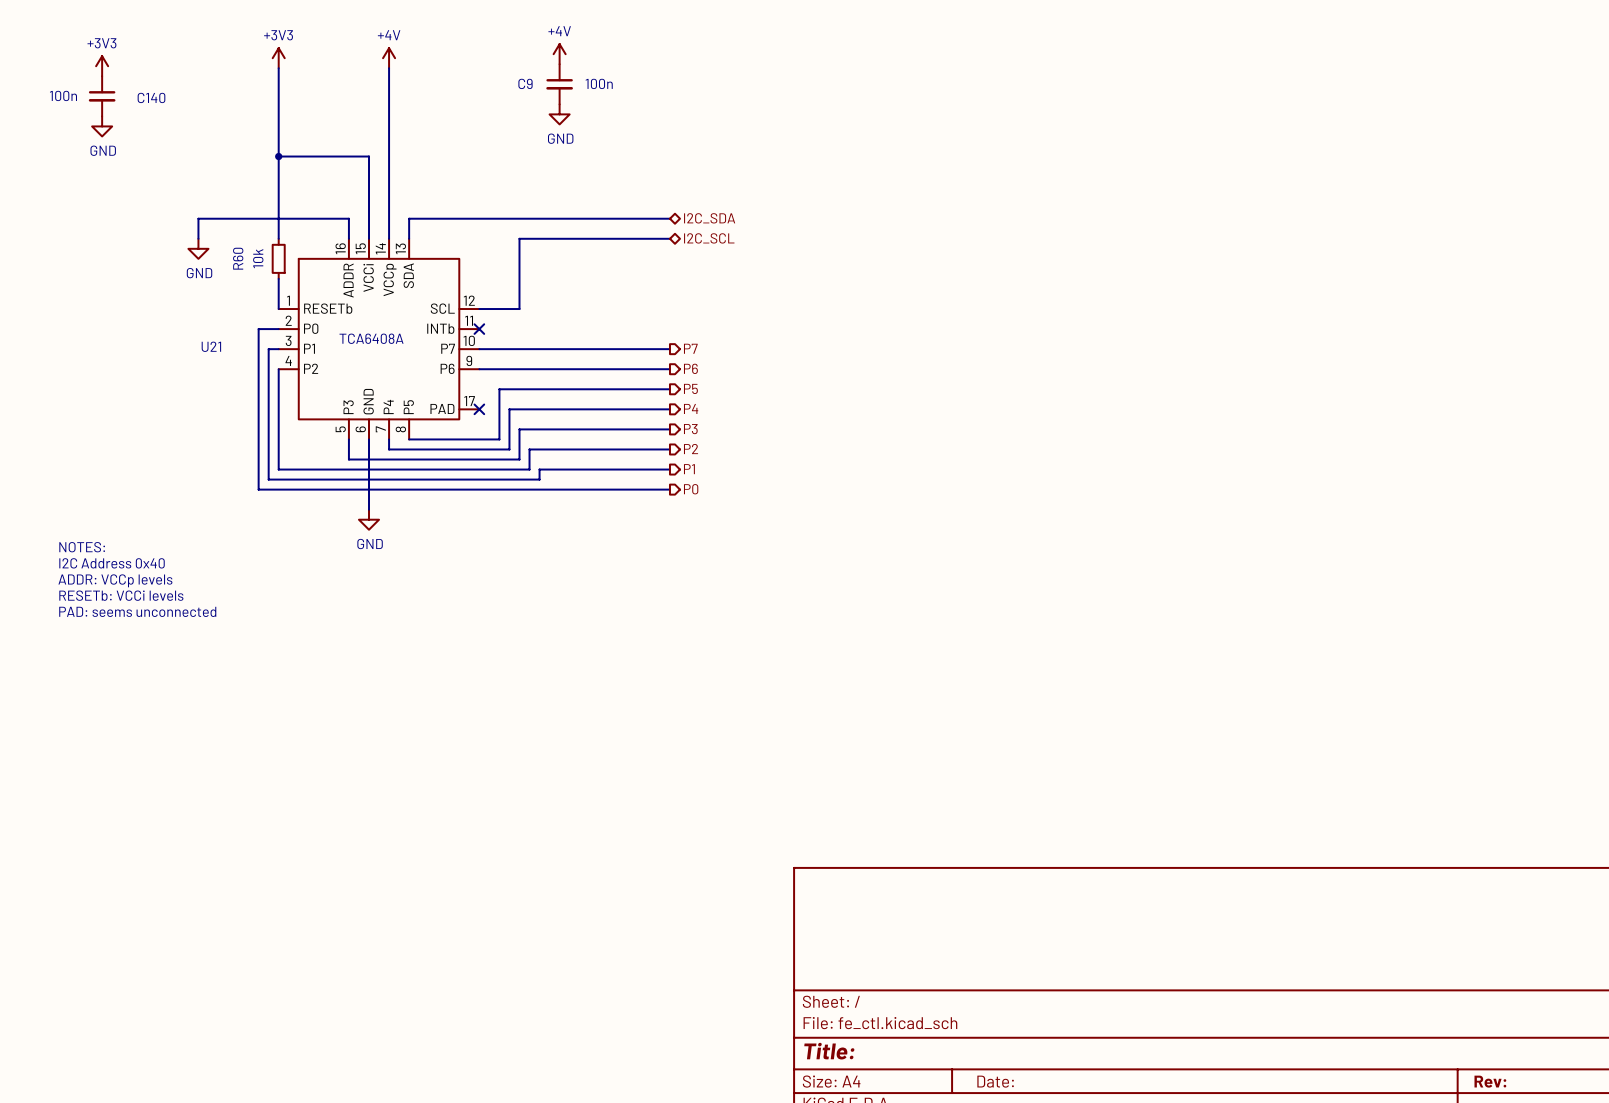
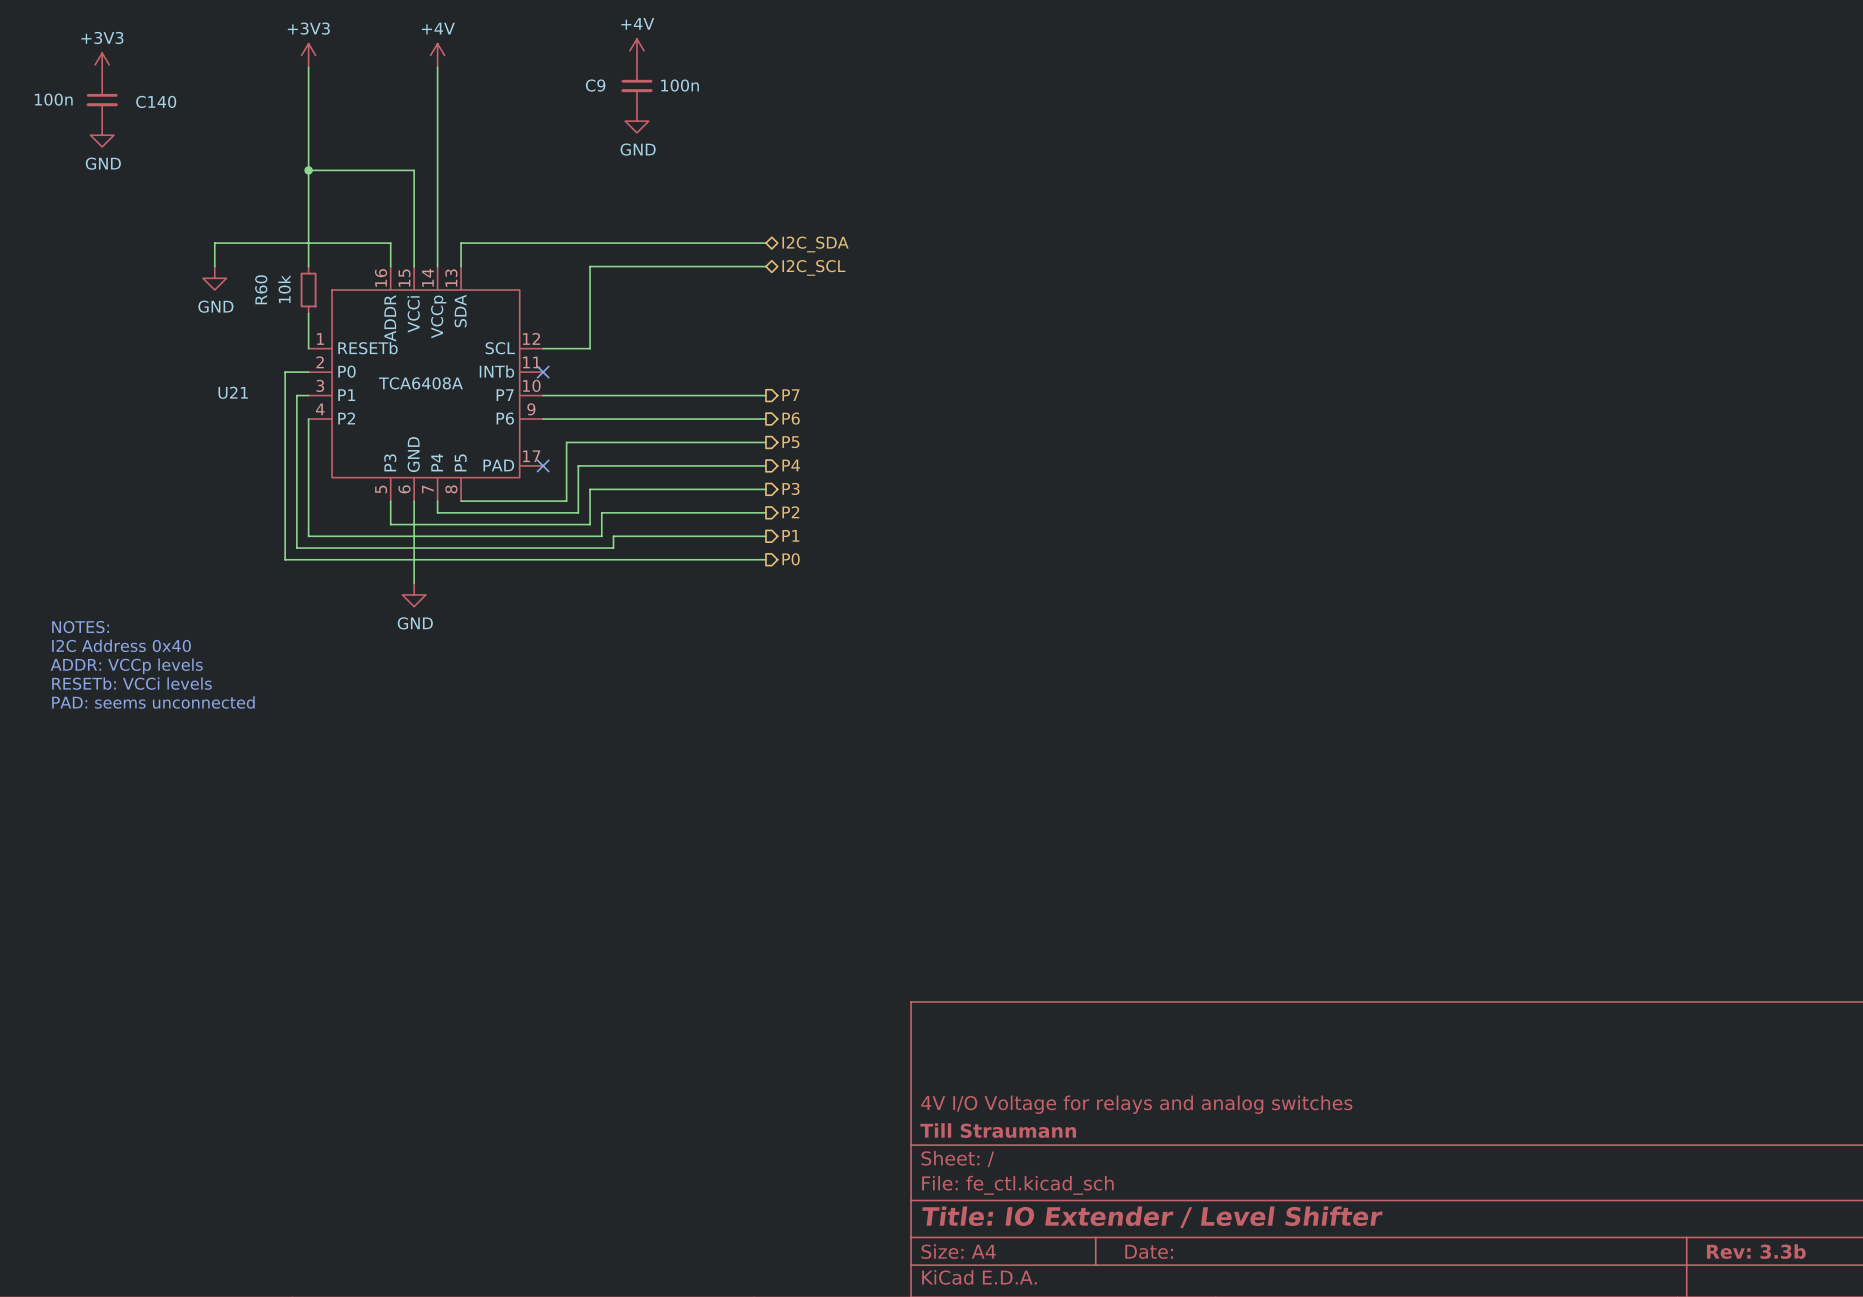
title block: none -> 4V I/O Voltage for relays and analog switches (1136, 1104)
title block: none -> Till Straumann (998, 1130)
title block: Title: (829, 1051) -> Title: IO Extender / Level Shifter (1152, 1217)
title block: Rev: (1490, 1081) -> Rev: 3.3b (1756, 1251)

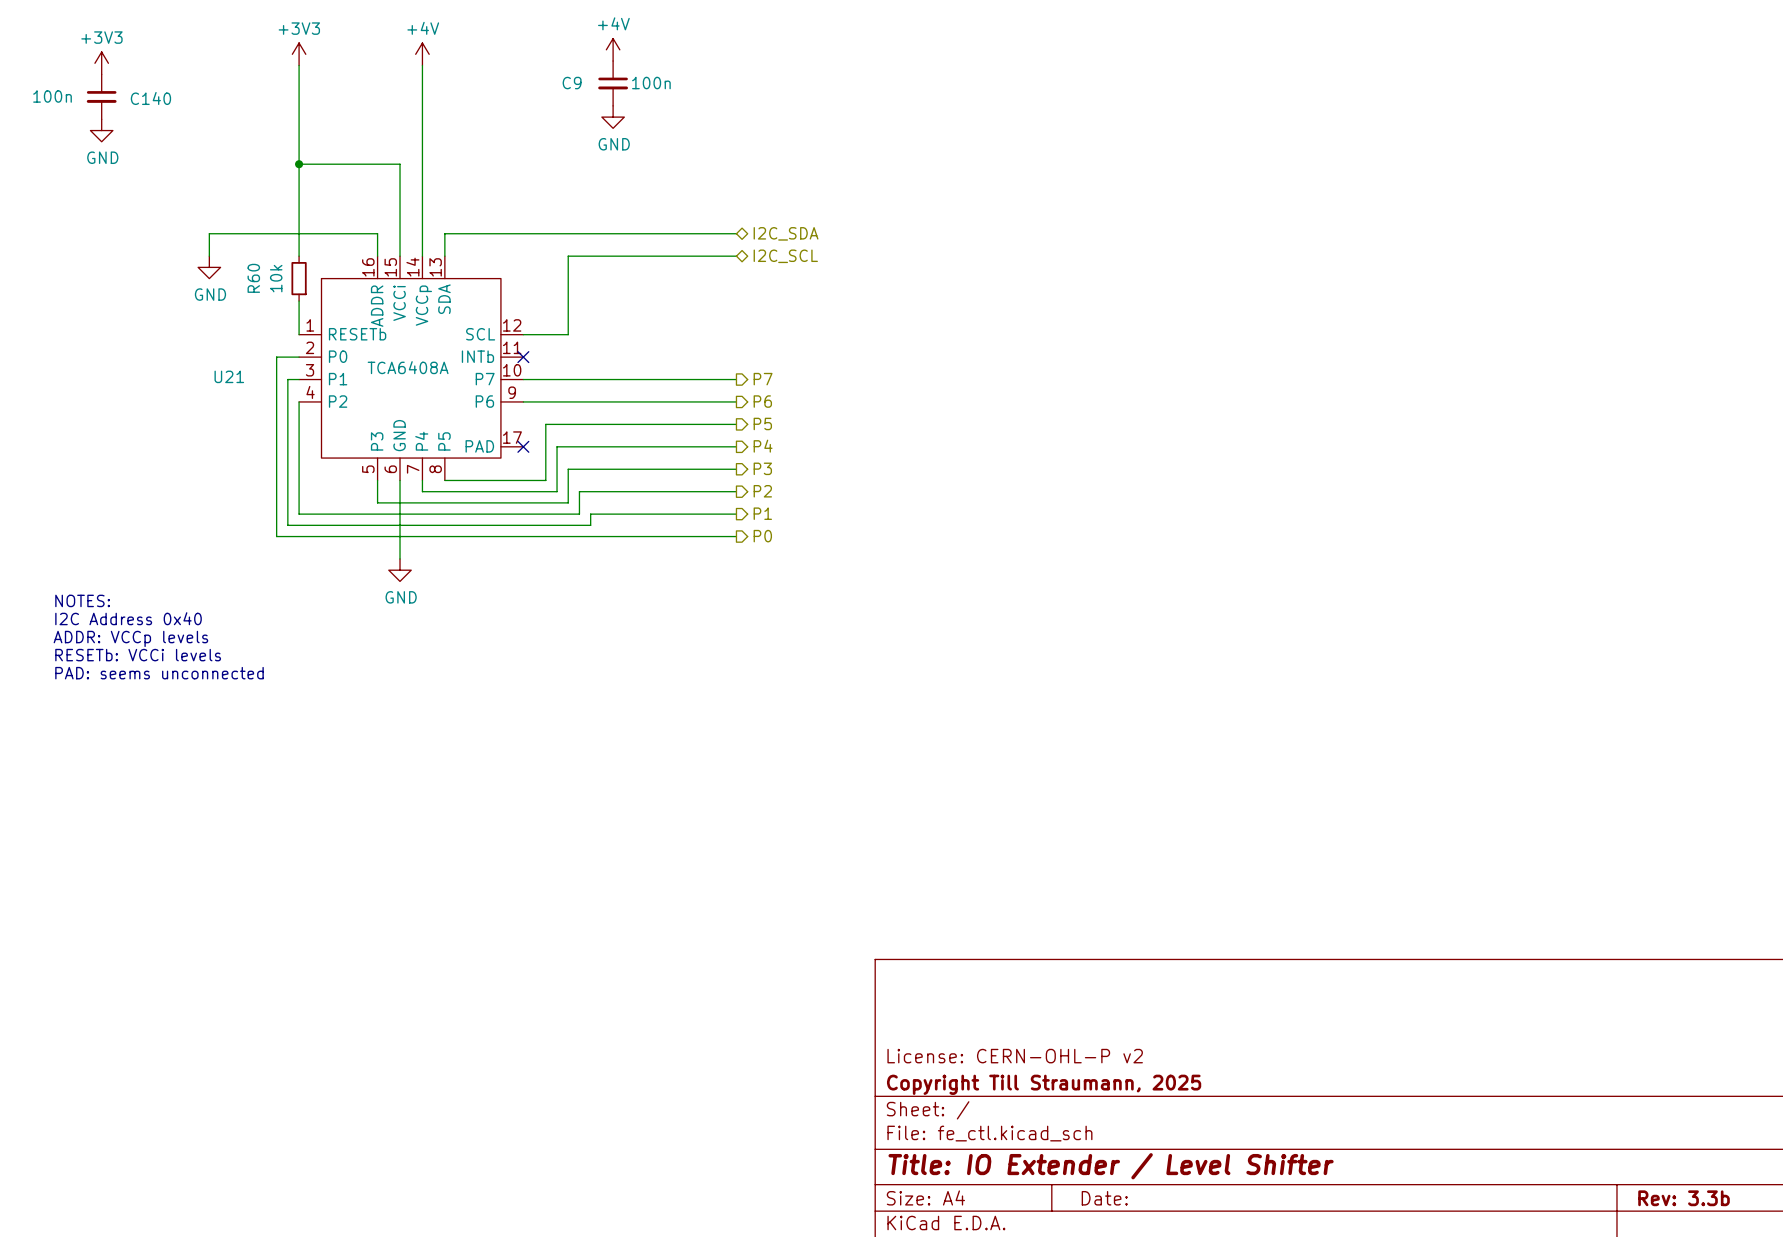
title block: 4V I/O Voltage for relays and analog switches (1136, 1104) -> License: CERN-OHL-P v2 (1015, 1056)
title block: Till Straumann (998, 1130) -> Copyright Till Straumann, 2025 (1044, 1084)

